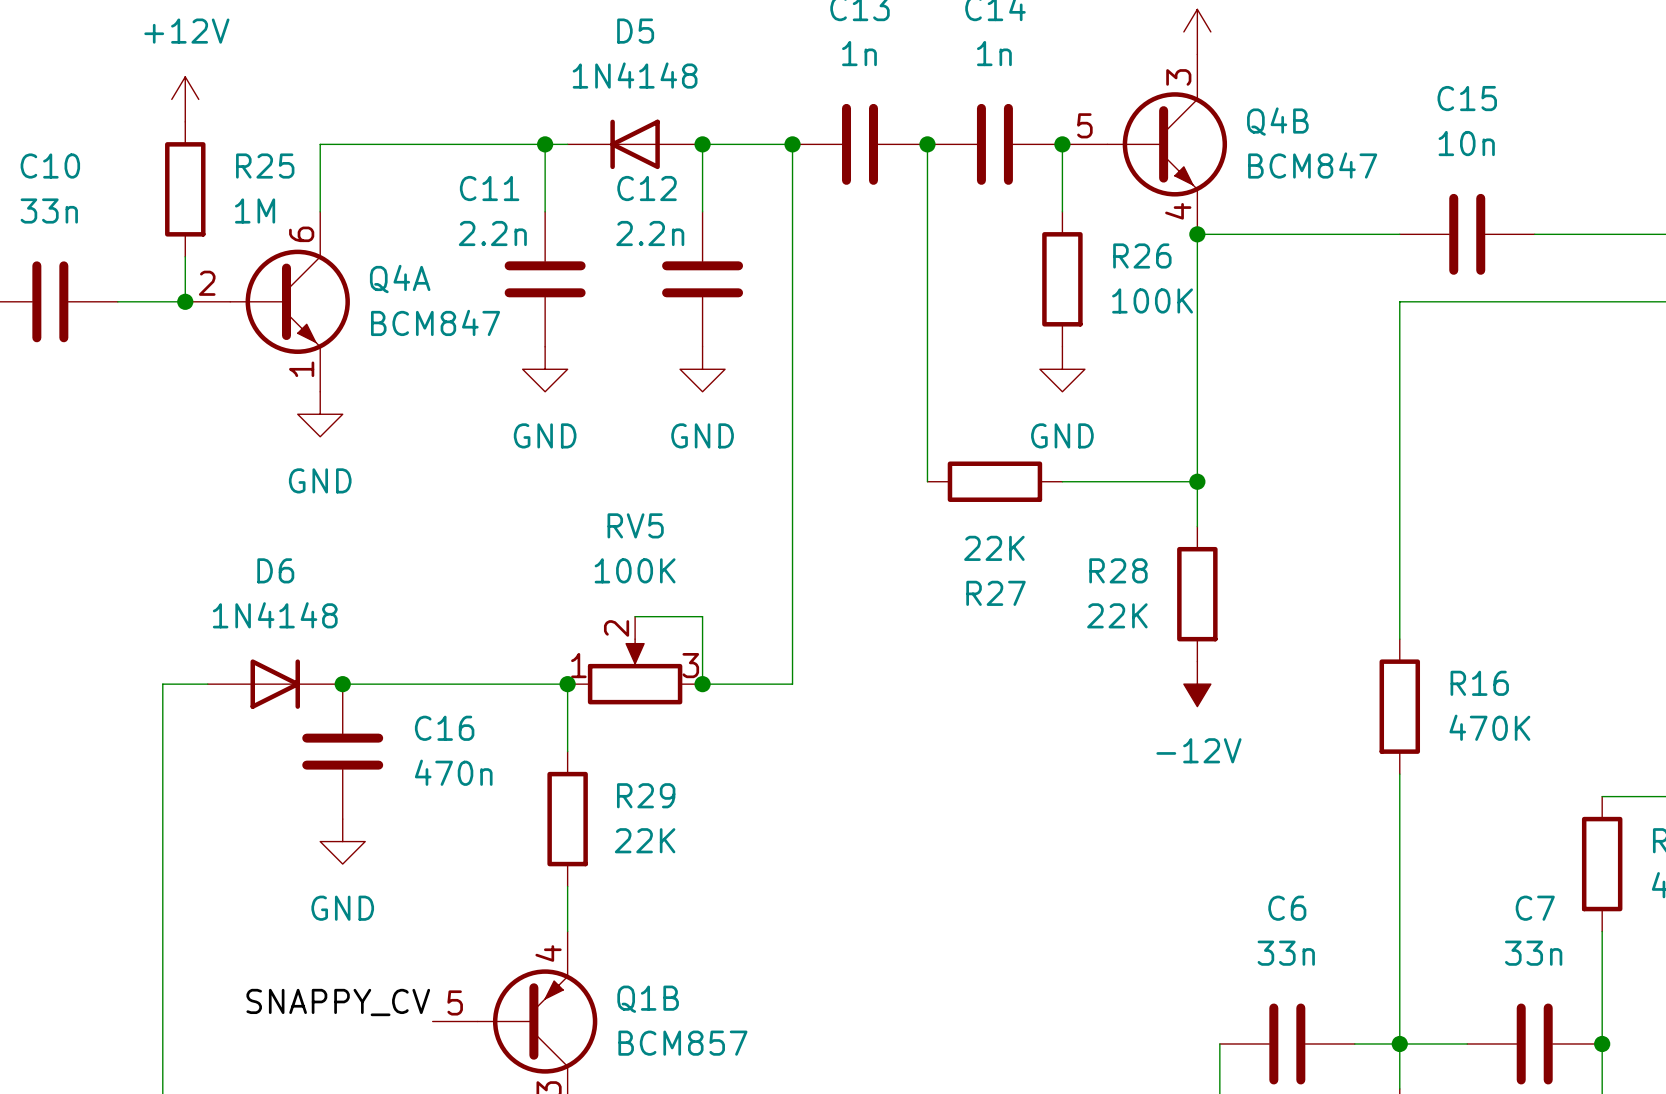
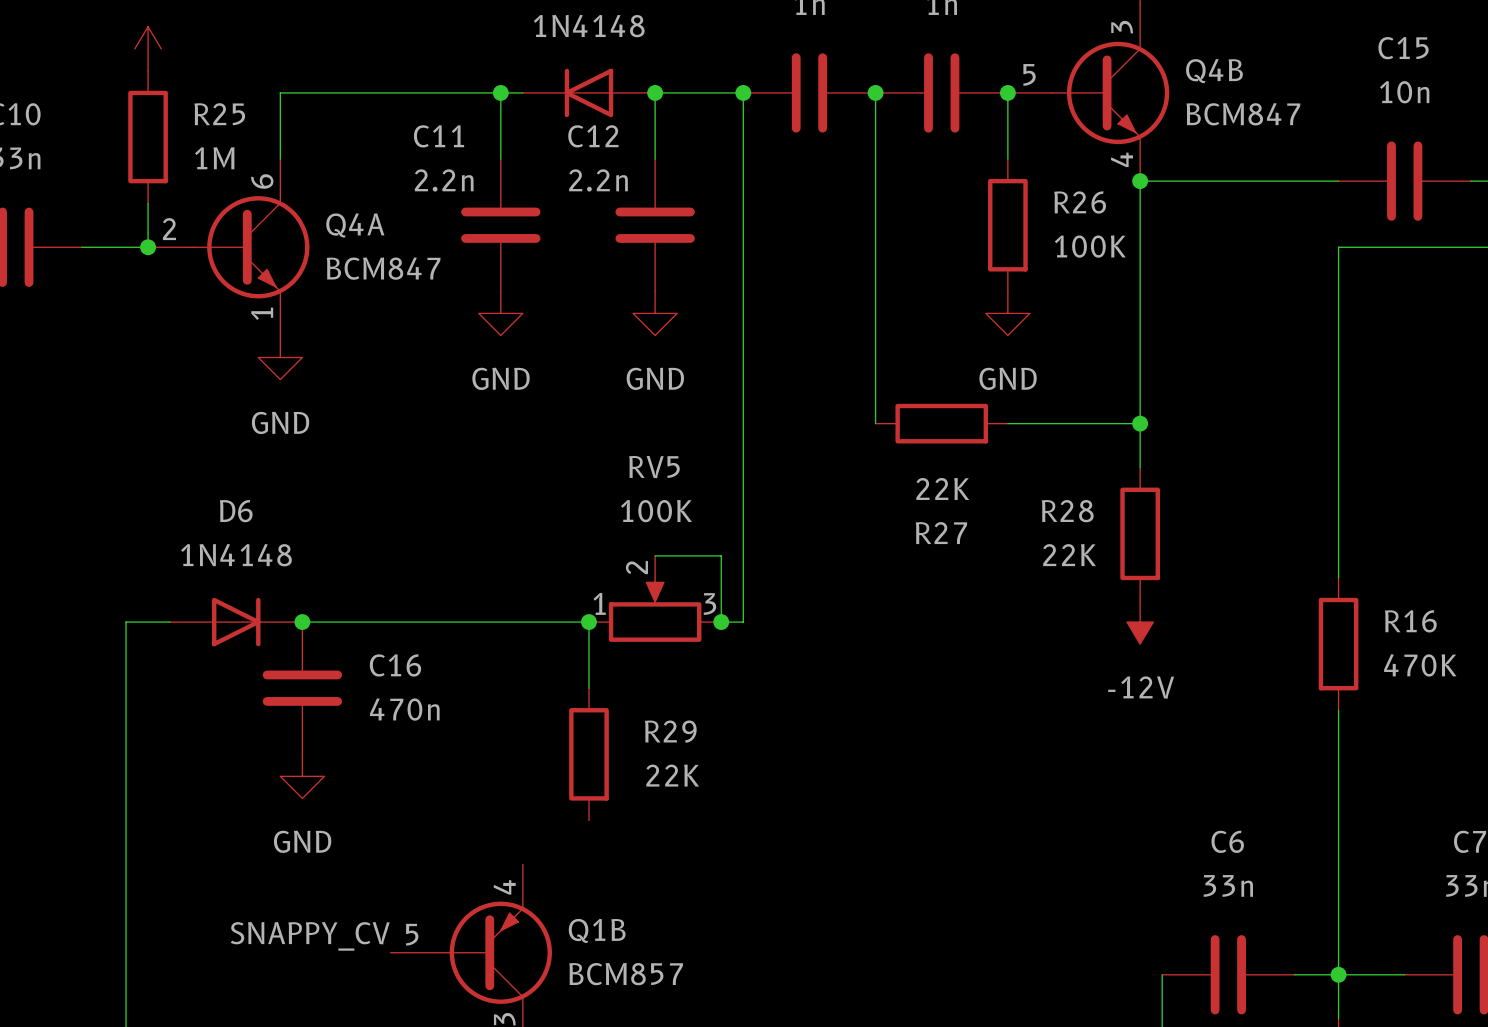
wire: (635, 616) (702, 616) (702, 684) (770, 684) -> (655, 555) (721, 555) (721, 622)
RV5 position: (635, 660) -> (655, 598)
wire: (567, 684) (567, 751) -> (522, 622) (588, 622) (588, 688)
junction: (567, 684) -> none
junction: none -> (588, 622)
junction: (702, 684) -> none
junction: none -> (721, 622)
R29 position: (567, 819) -> (588, 754)
wire: (567, 886) (567, 931) -> none

